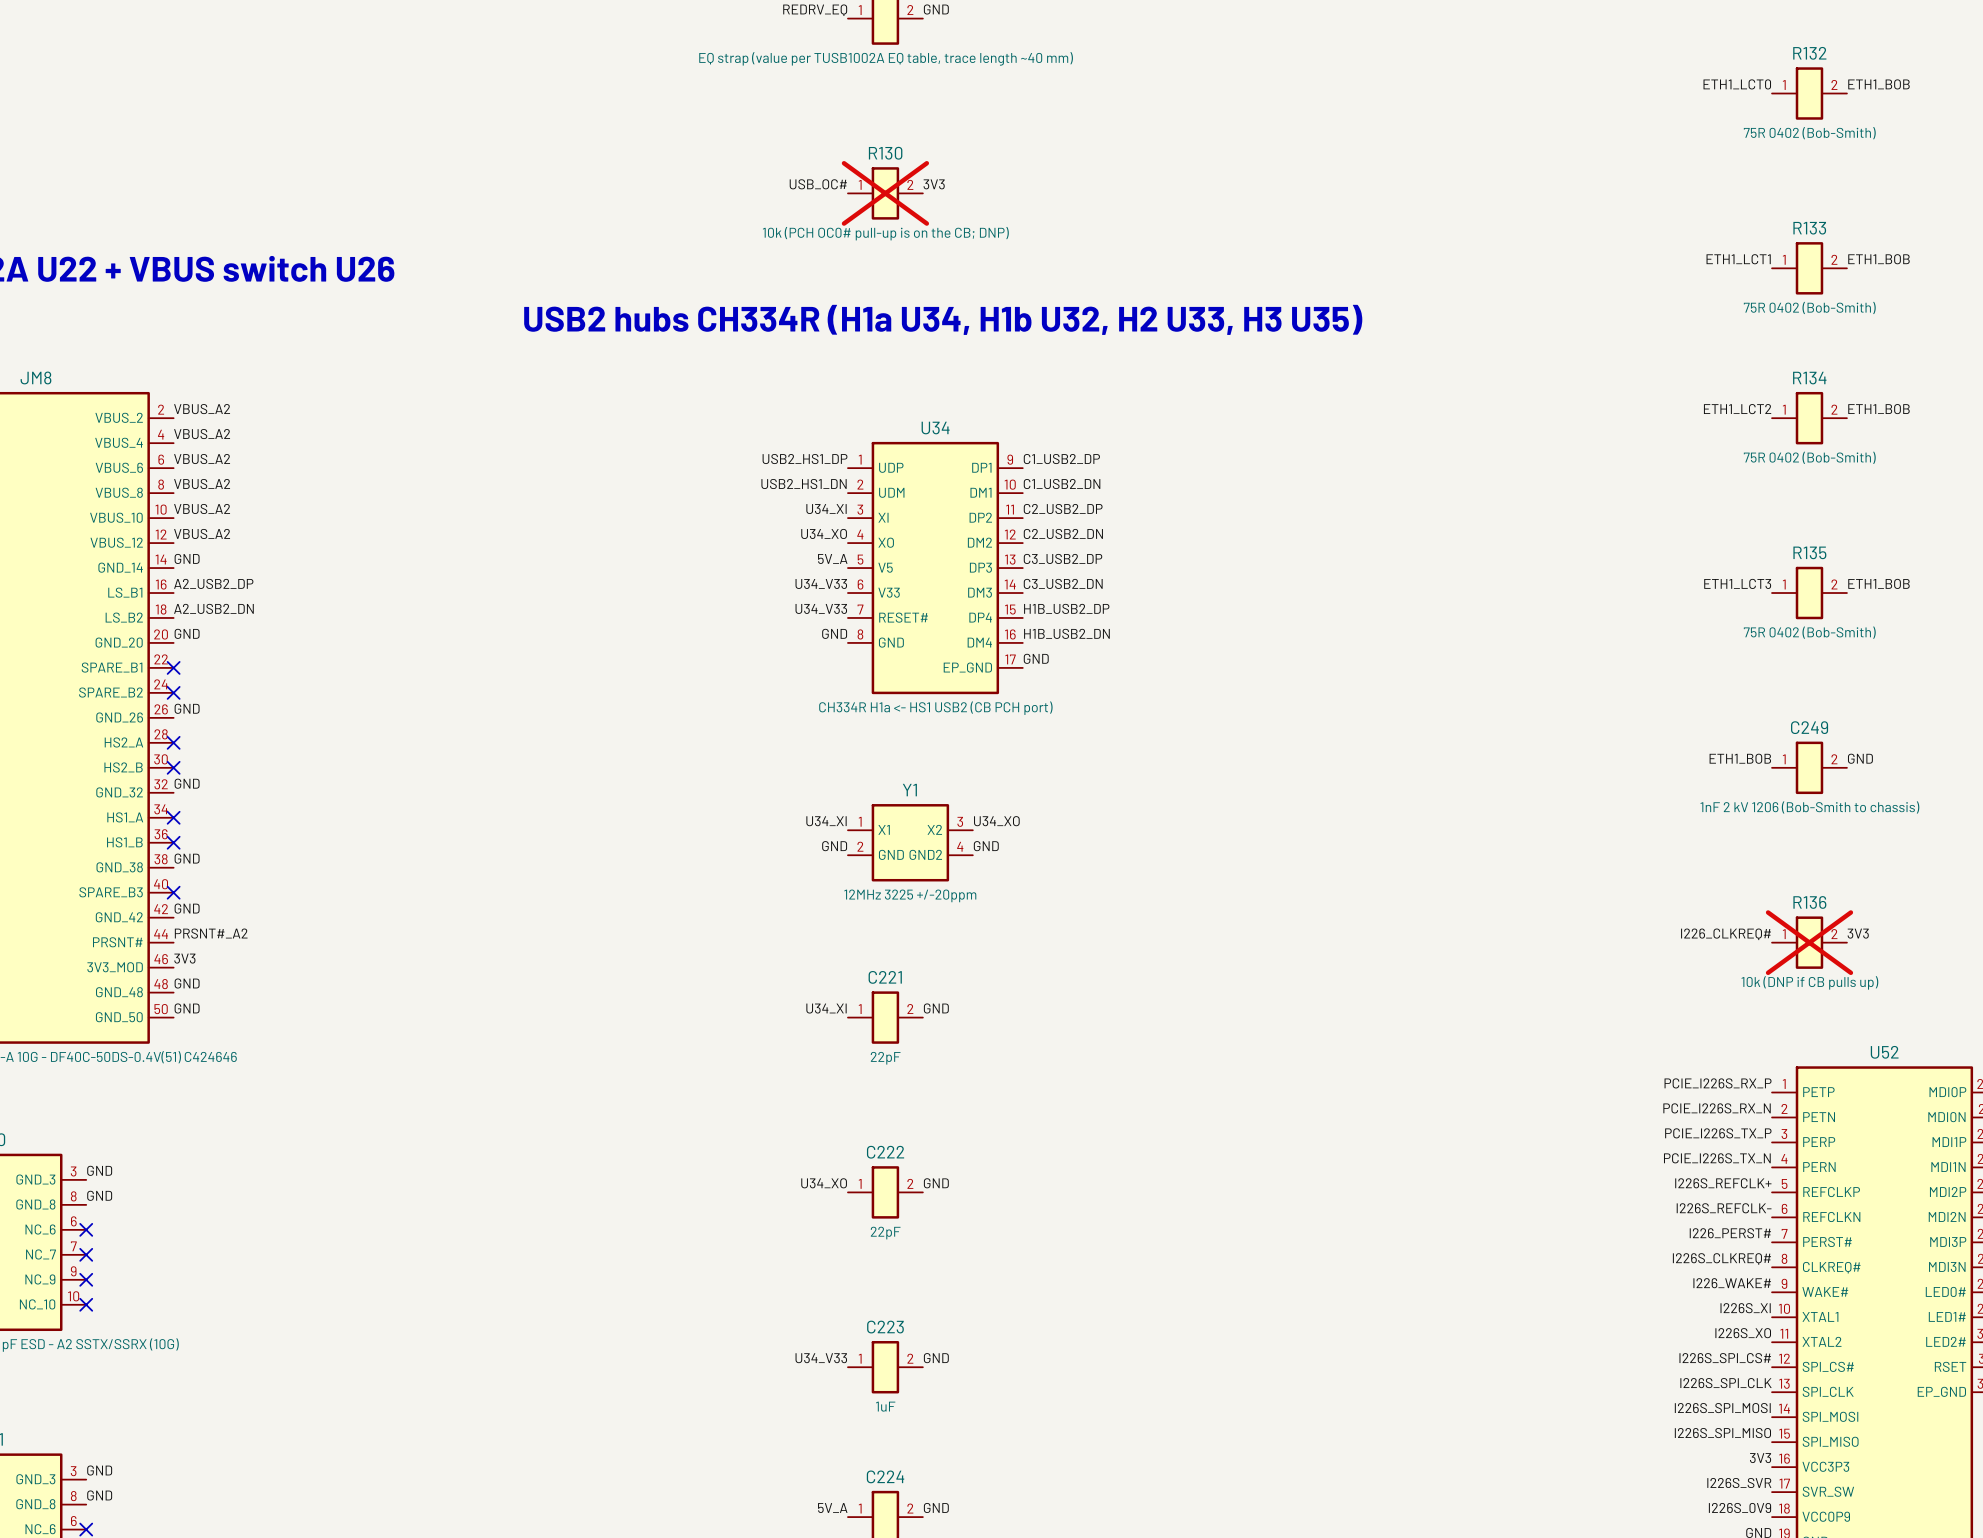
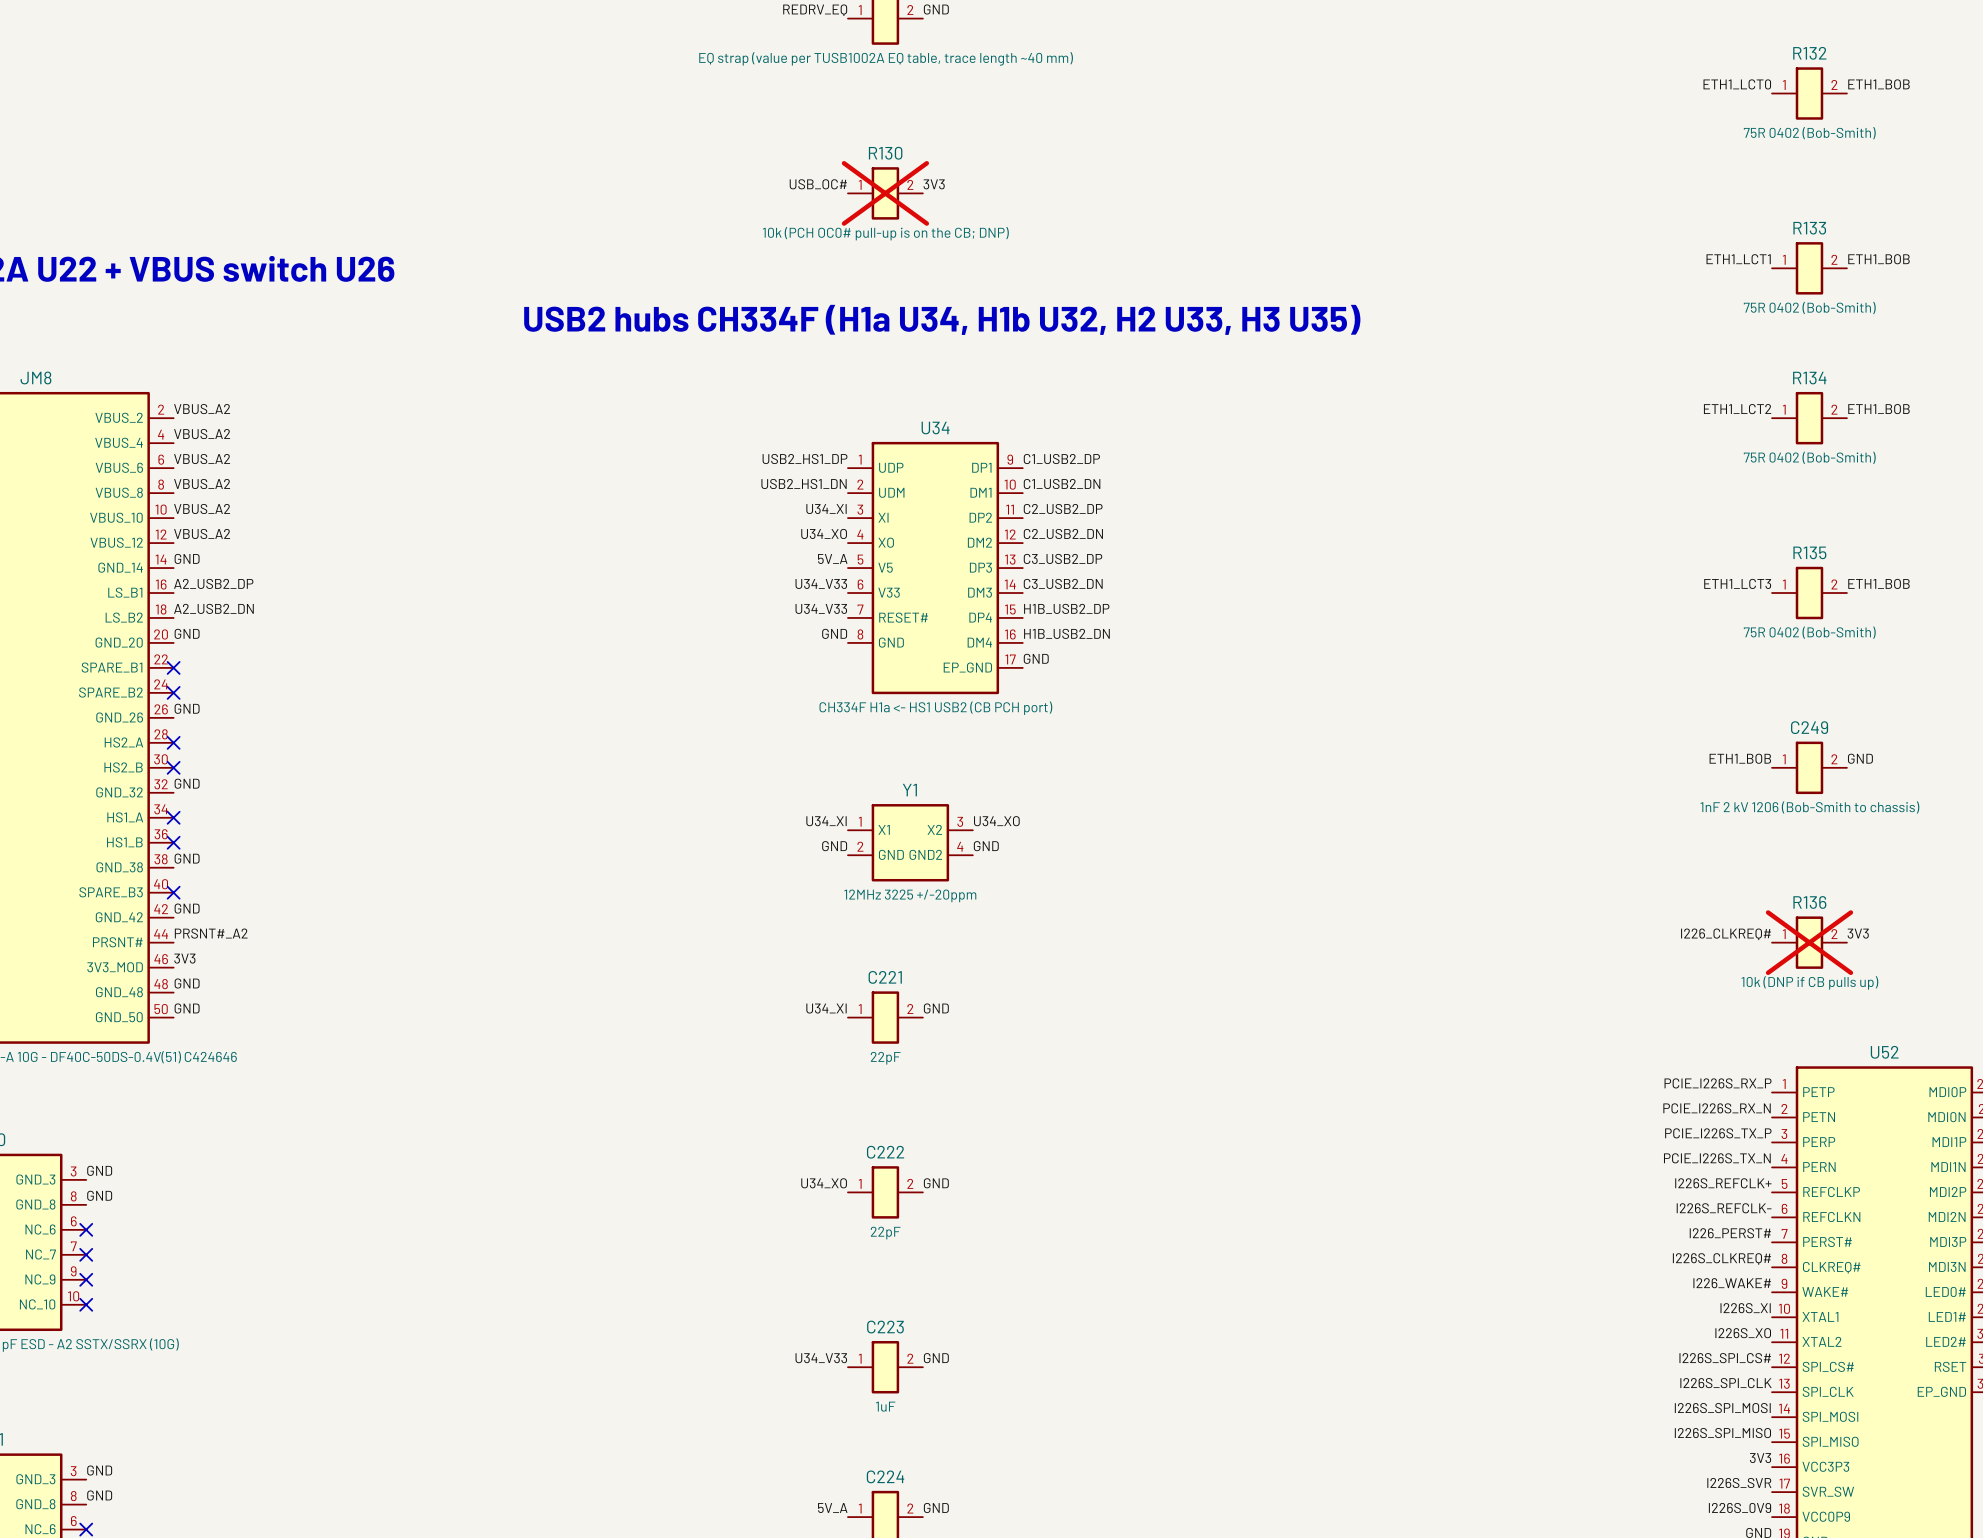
text: USB2 hubs CH334R (H1a U34, H1b U32, H2 U33, H3 U35) (943, 319) -> USB2 hubs CH334F (H1a U34, H1b U32, H2 U33, H3 U35) (942, 319)
U34 value: CH334R H1a <- HS1 USB2 (CB PCH port) (935, 708) -> CH334F H1a <- HS1 USB2 (CB PCH port) (935, 708)

